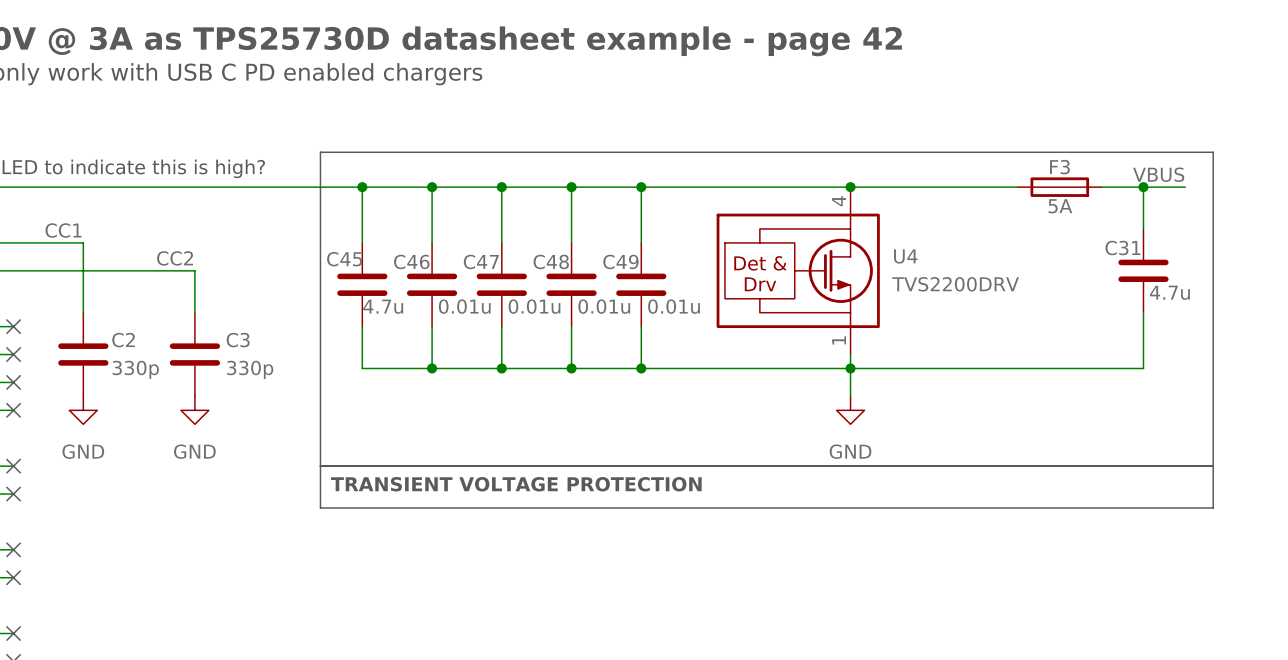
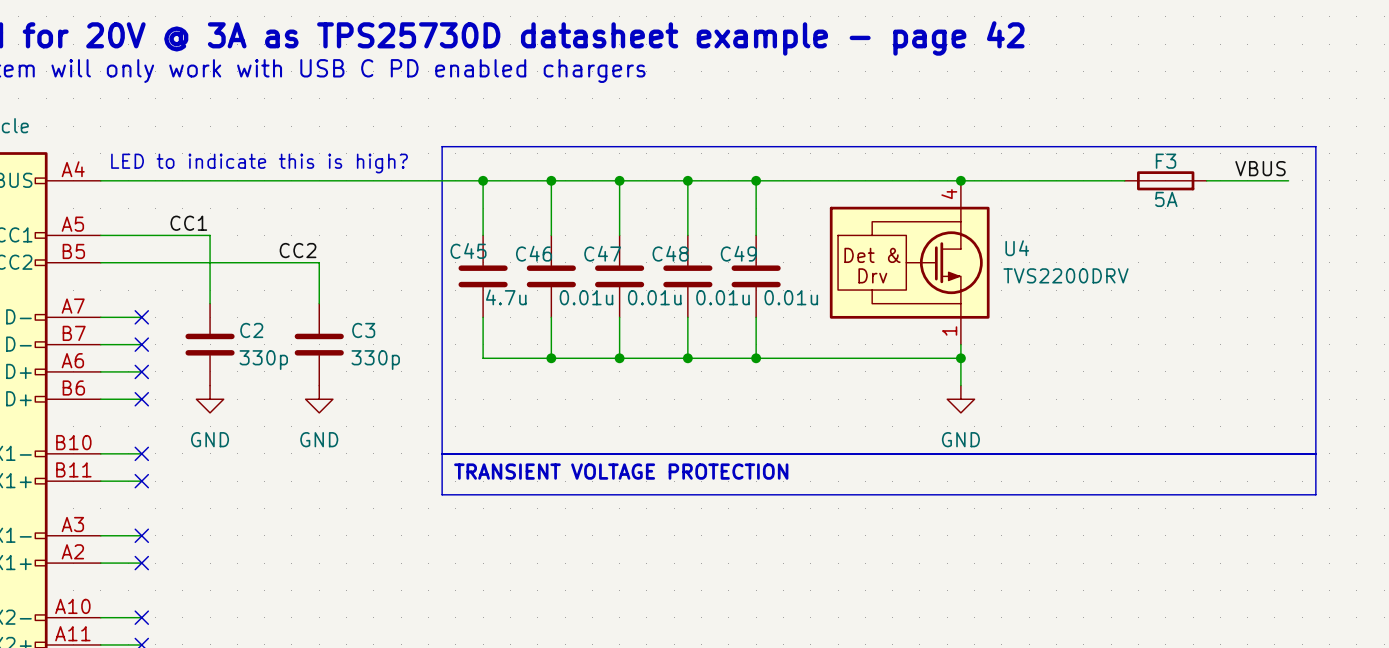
wire: (1143, 187) (1143, 228) -> none
junction: (1143, 187) -> none
C31: 4.7u (1143, 270) -> none
wire: (1143, 312) (1143, 368) (850, 368) -> none

